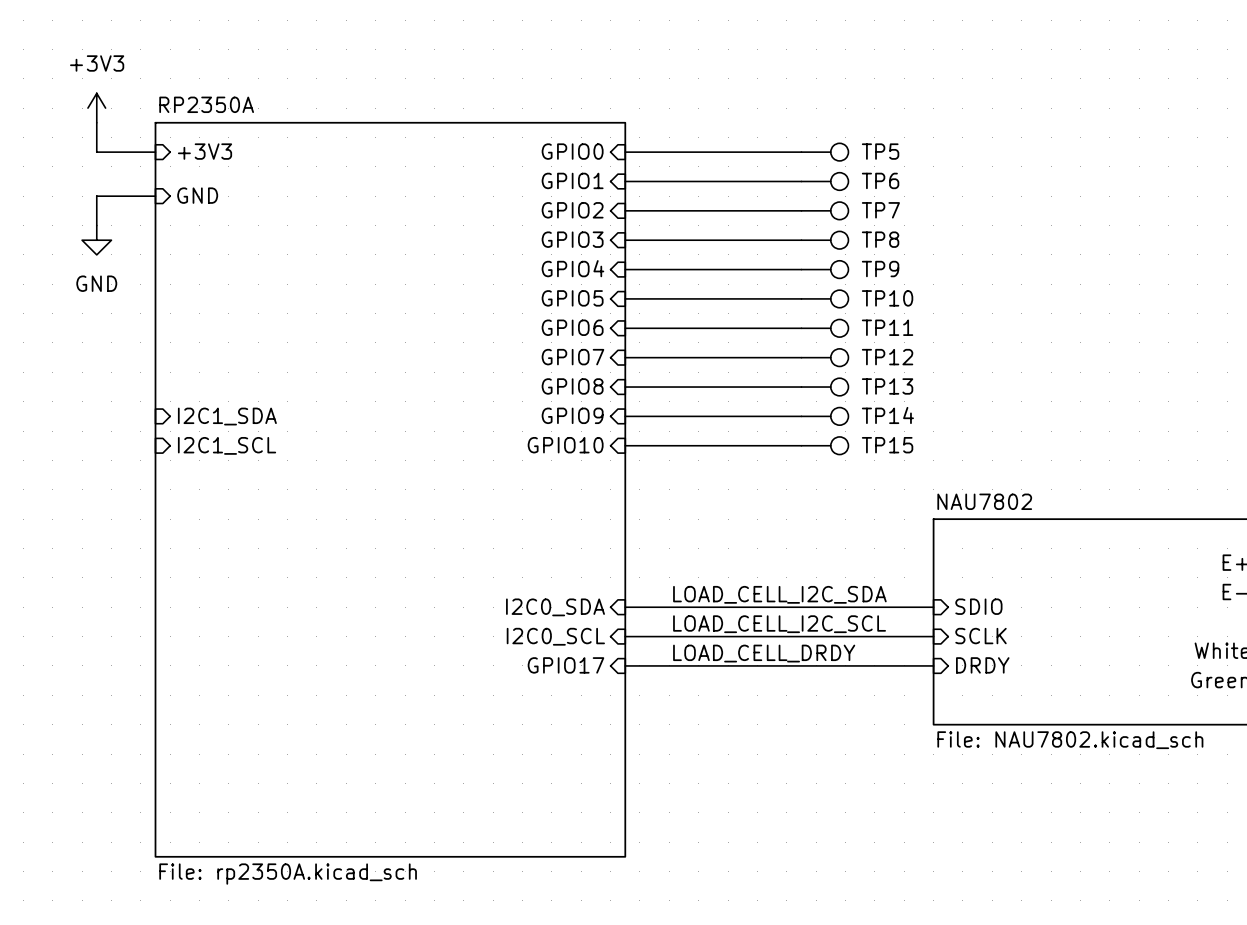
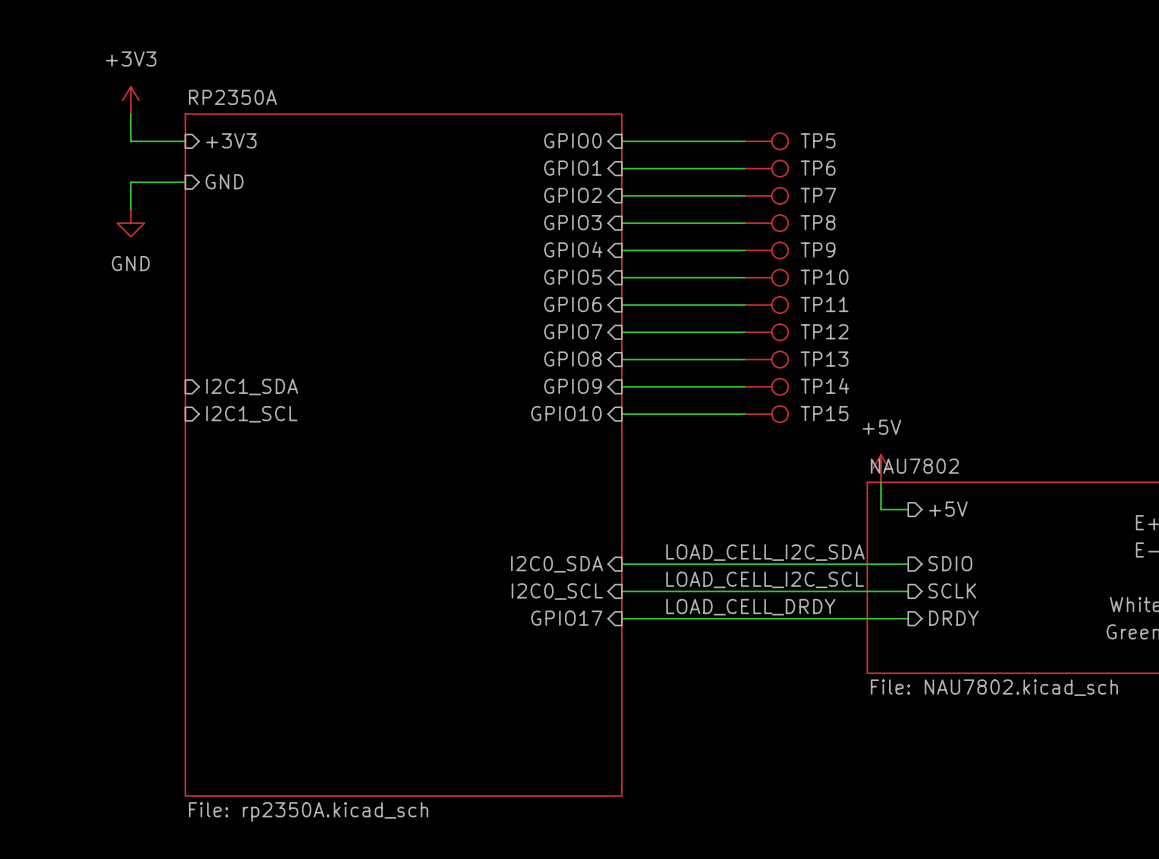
power symbol position: +3V3 (96, 108) -> +3V3 (130, 100)
wire: (96, 122) (96, 152) (140, 152) -> (130, 114) (130, 141)
sheet pin position: +3V3 (205, 151) -> +3V3 (231, 140)
sheet pin position: GPIO0 (572, 151) -> GPIO0 (572, 140)
wire: none -> (144, 141) (185, 141)
wire: (625, 152) (669, 152) -> none
sheet pin position: GPIO1 (572, 180) -> GPIO1 (572, 168)
wire: (625, 181) (669, 181) -> none
sheet pin position: GND (197, 195) -> GND (224, 181)
wire: (140, 196) (96, 196) (96, 225) -> (130, 182) (130, 209)
wire: none -> (144, 182) (185, 182)
sheet pin position: GPIO2 (572, 210) -> GPIO2 (572, 195)
wire: (625, 210) (669, 210) -> none
sheet pin position: GPIO3 (572, 239) -> GPIO3 (572, 222)
power symbol position: GND (96, 240) -> GND (130, 223)
wire: (625, 240) (669, 240) -> none
sheet pin position: GPIO4 (572, 268) -> GPIO4 (573, 249)
wire: (625, 269) (669, 269) -> none
sheet pin position: GPIO5 (572, 298) -> GPIO5 (572, 277)
wire: (625, 298) (669, 298) -> none
sheet pin position: GPIO6 (572, 327) -> GPIO6 (572, 304)
wire: (625, 328) (669, 328) -> none
sheet pin position: GPIO7 (572, 357) -> GPIO7 (573, 331)
wire: (625, 357) (669, 357) -> none
sheet pin position: GPIO8 (572, 386) -> GPIO8 (572, 359)
wire: (625, 387) (669, 387) -> none
sheet pin position: GPIO9 (572, 415) -> GPIO9 (572, 386)
sheet pin position: I2C1_SDA (227, 416) -> I2C1_SDA (252, 386)
wire: (625, 416) (669, 416) -> none
sheet pin position: I2C1_SCL (227, 445) -> I2C1_SCL (251, 414)
sheet pin position: GPIO10 (565, 445) -> GPIO10 (566, 413)
wire: (625, 445) (669, 445) -> none
sheet RP2350A position: (390, 489) -> (403, 455)
power symbol: none -> +5V (880, 468)
wire: none -> (880, 482) (880, 509) (908, 509)
sheet pin: none -> +5V (948, 509)
label position: LOAD_CELL_I2C_SDA (779, 594) -> LOAD_CELL_I2C_SDA (765, 552)
sheet pin position: SDIO (978, 606) -> SDIO (950, 563)
sheet pin position: I2C0_SDA (555, 607) -> I2C0_SDA (556, 564)
wire: (625, 607) (669, 607) -> none
wire: none -> (867, 564) (908, 564)
label position: LOAD_CELL_I2C_SCL (779, 624) -> LOAD_CELL_I2C_SCL (765, 579)
sheet pin position: I2C0_SCL (555, 636) -> I2C0_SCL (557, 591)
wire: (625, 636) (669, 636) -> none
wire: none -> (867, 591) (908, 591)
sheet pin position: SCLK (981, 636) -> SCLK (952, 590)
label position: LOAD_CELL_DRDY (764, 653) -> LOAD_CELL_DRDY (750, 607)
sheet pin position: GPIO17 (565, 665) -> GPIO17 (566, 618)
wire: (625, 665) (669, 665) -> none
wire: none -> (867, 618) (908, 618)
sheet pin position: DRDY (982, 665) -> DRDY (953, 618)

